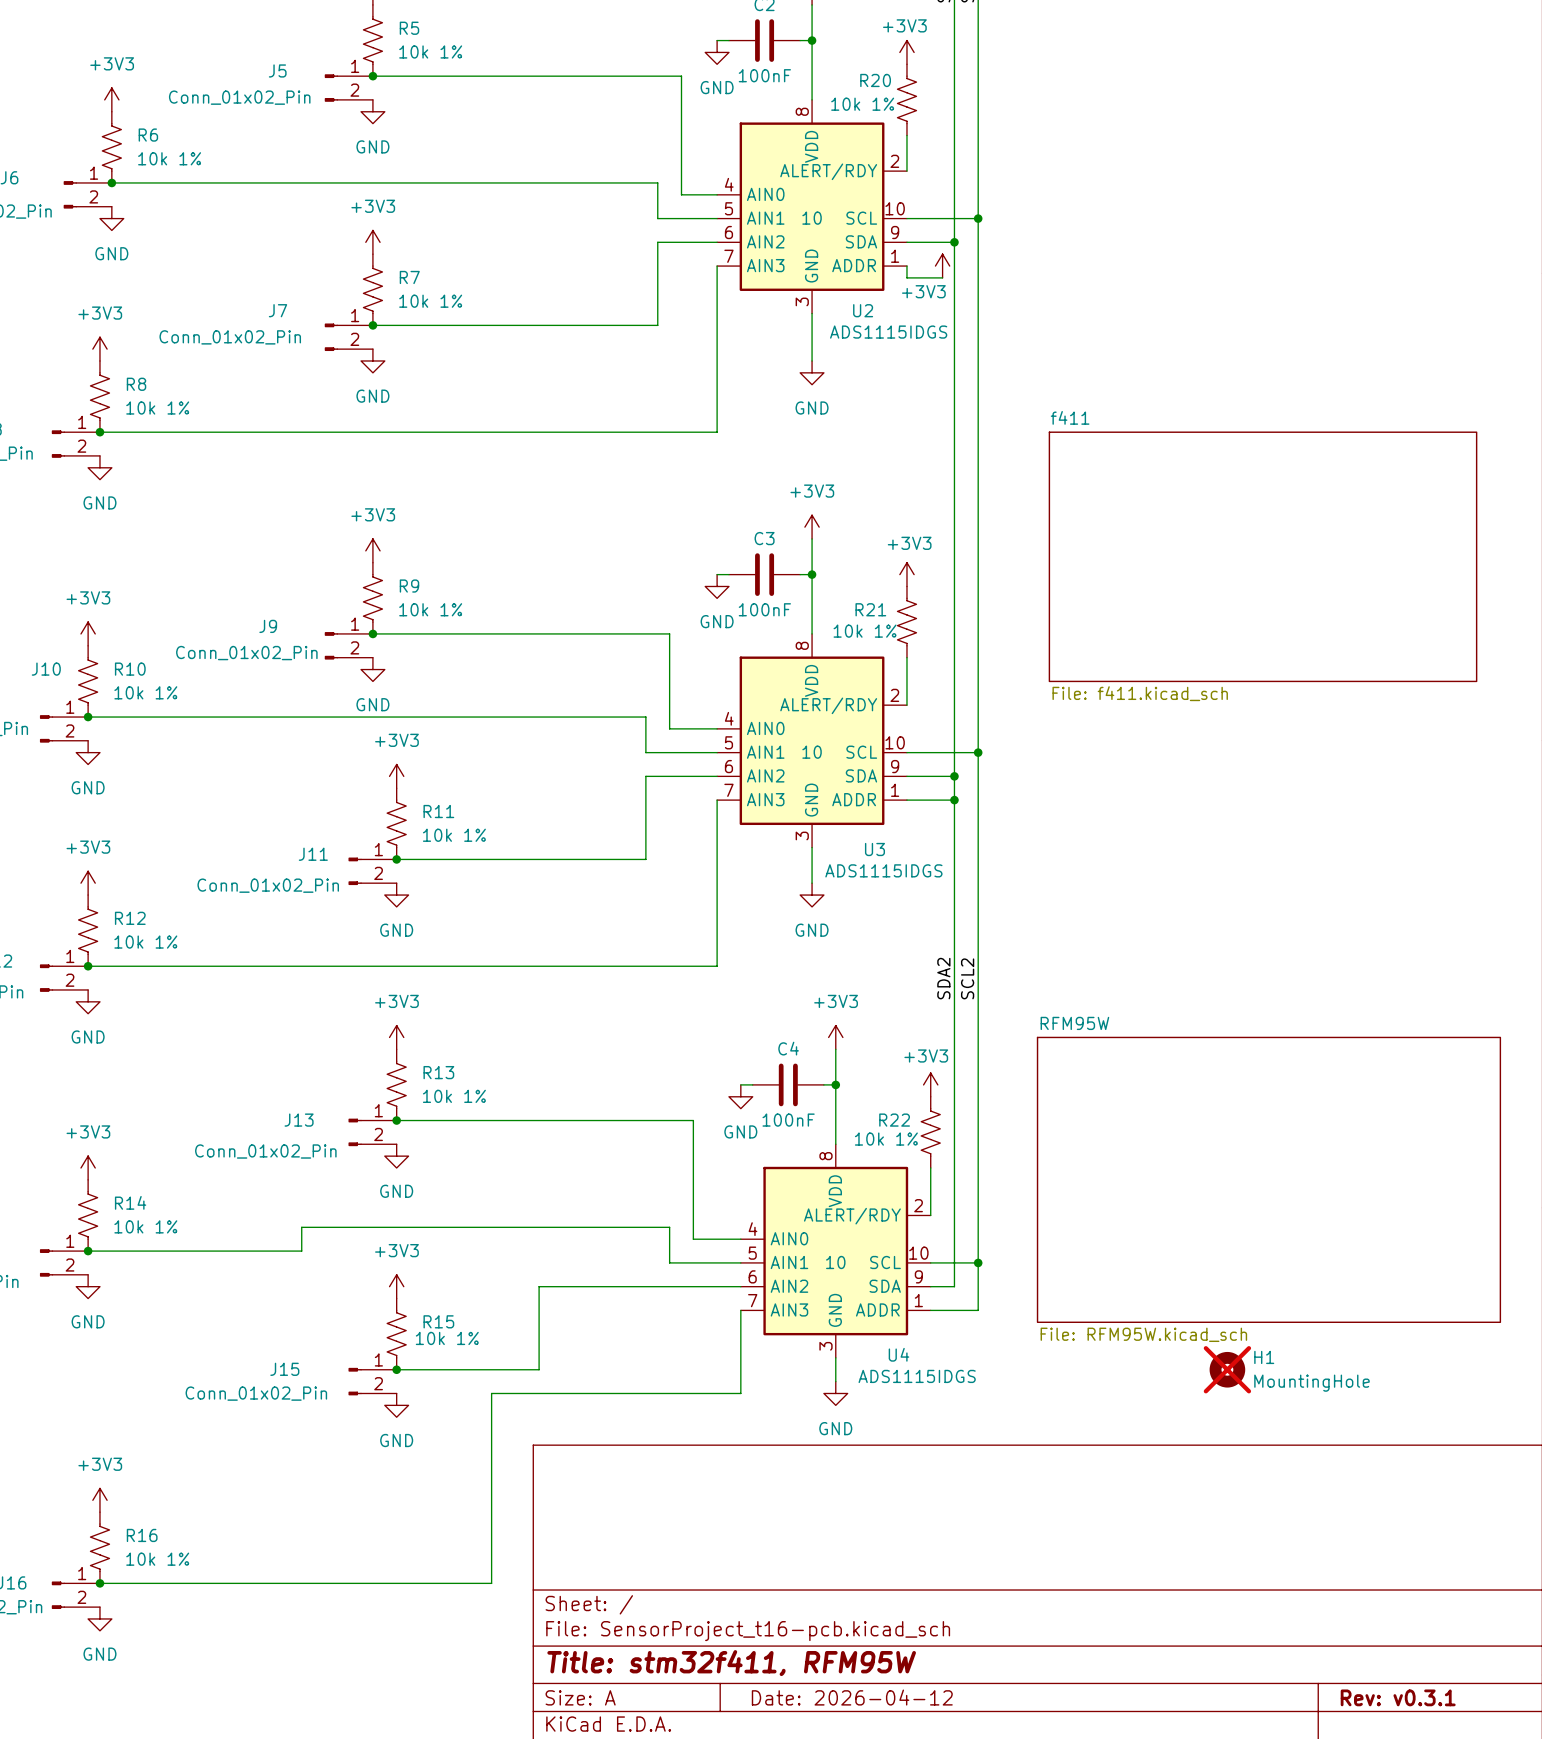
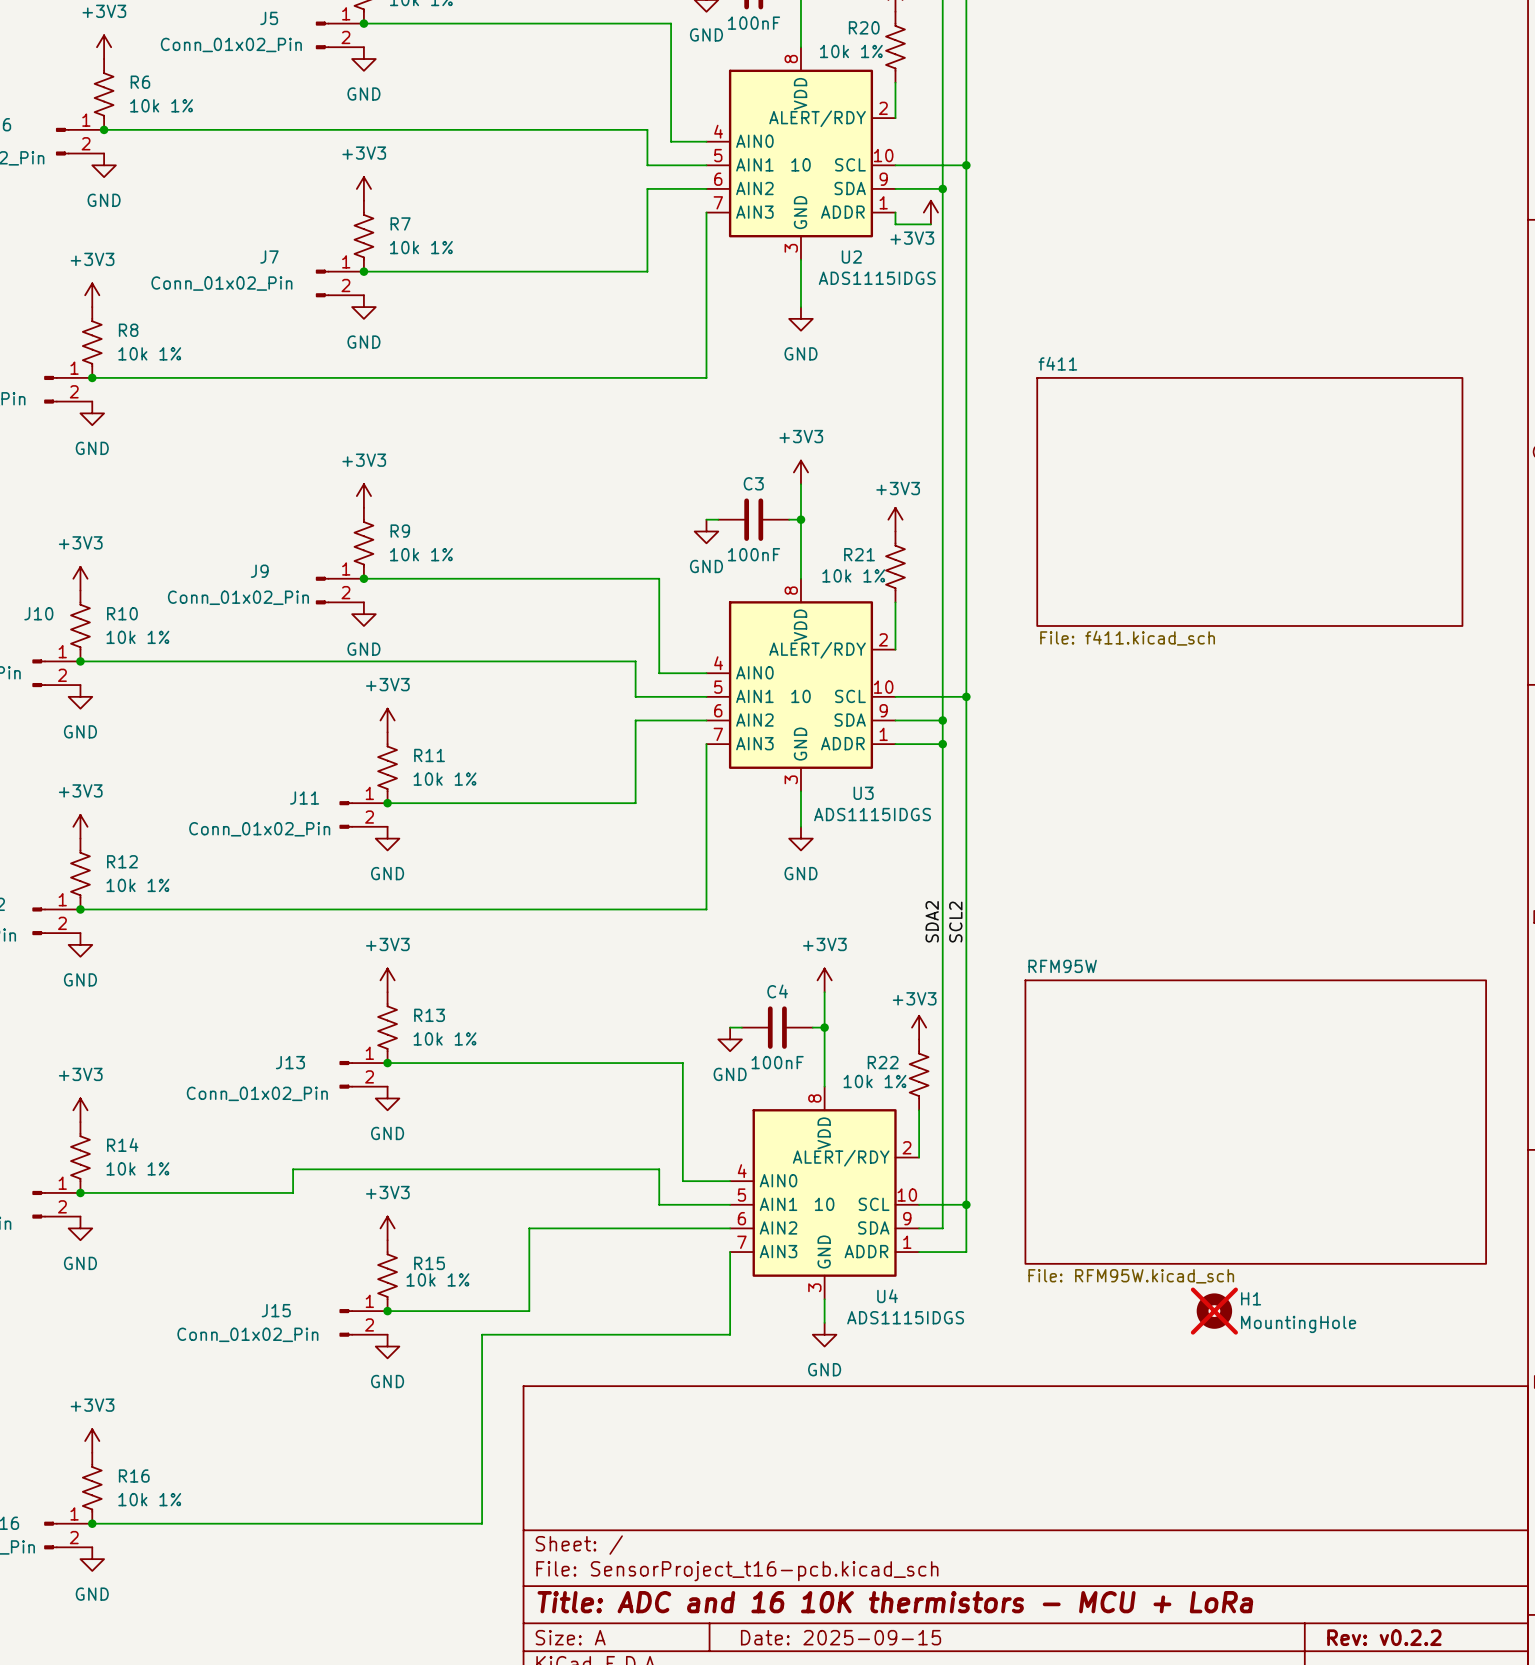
title block: Title: stm32f411, RFM95W (731, 1663) -> Title: ADC and 16 10K thermistors - MCU + LoRa (895, 1602)
title block: Date: 2026-04-12 (852, 1697) -> Date: 2025-09-15 (841, 1637)
title block: Rev: v0.3.1 (1398, 1697) -> Rev: v0.2.2 (1384, 1637)

